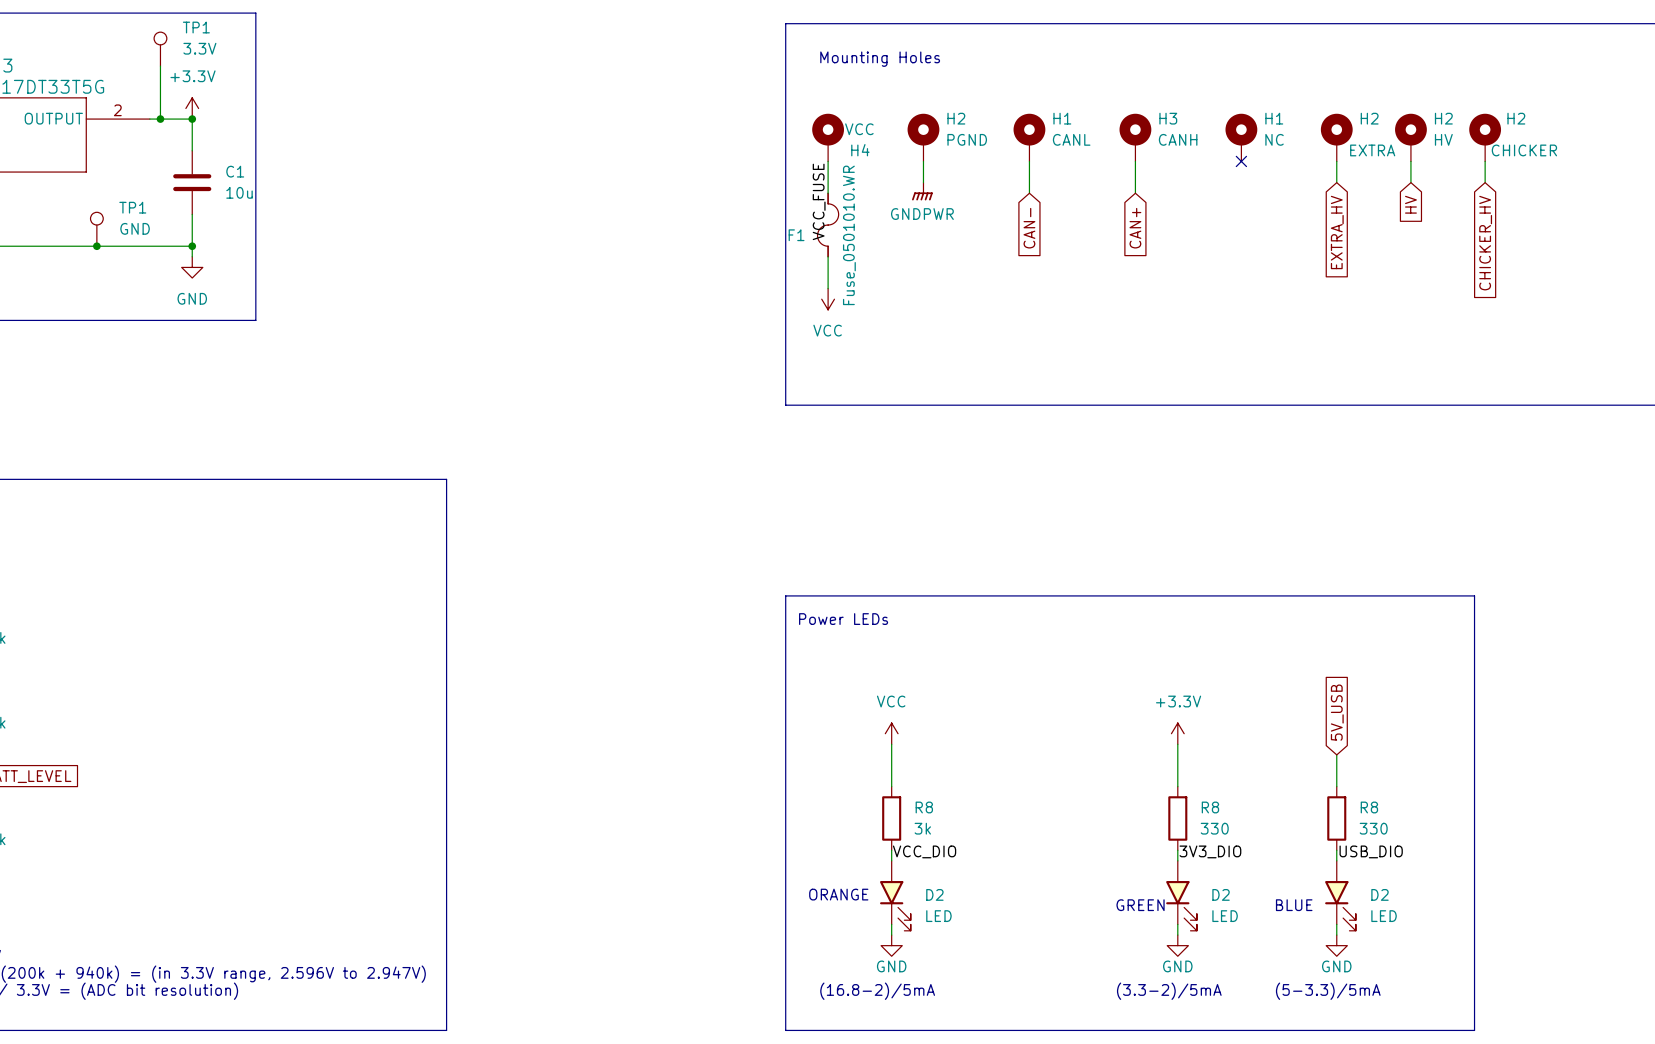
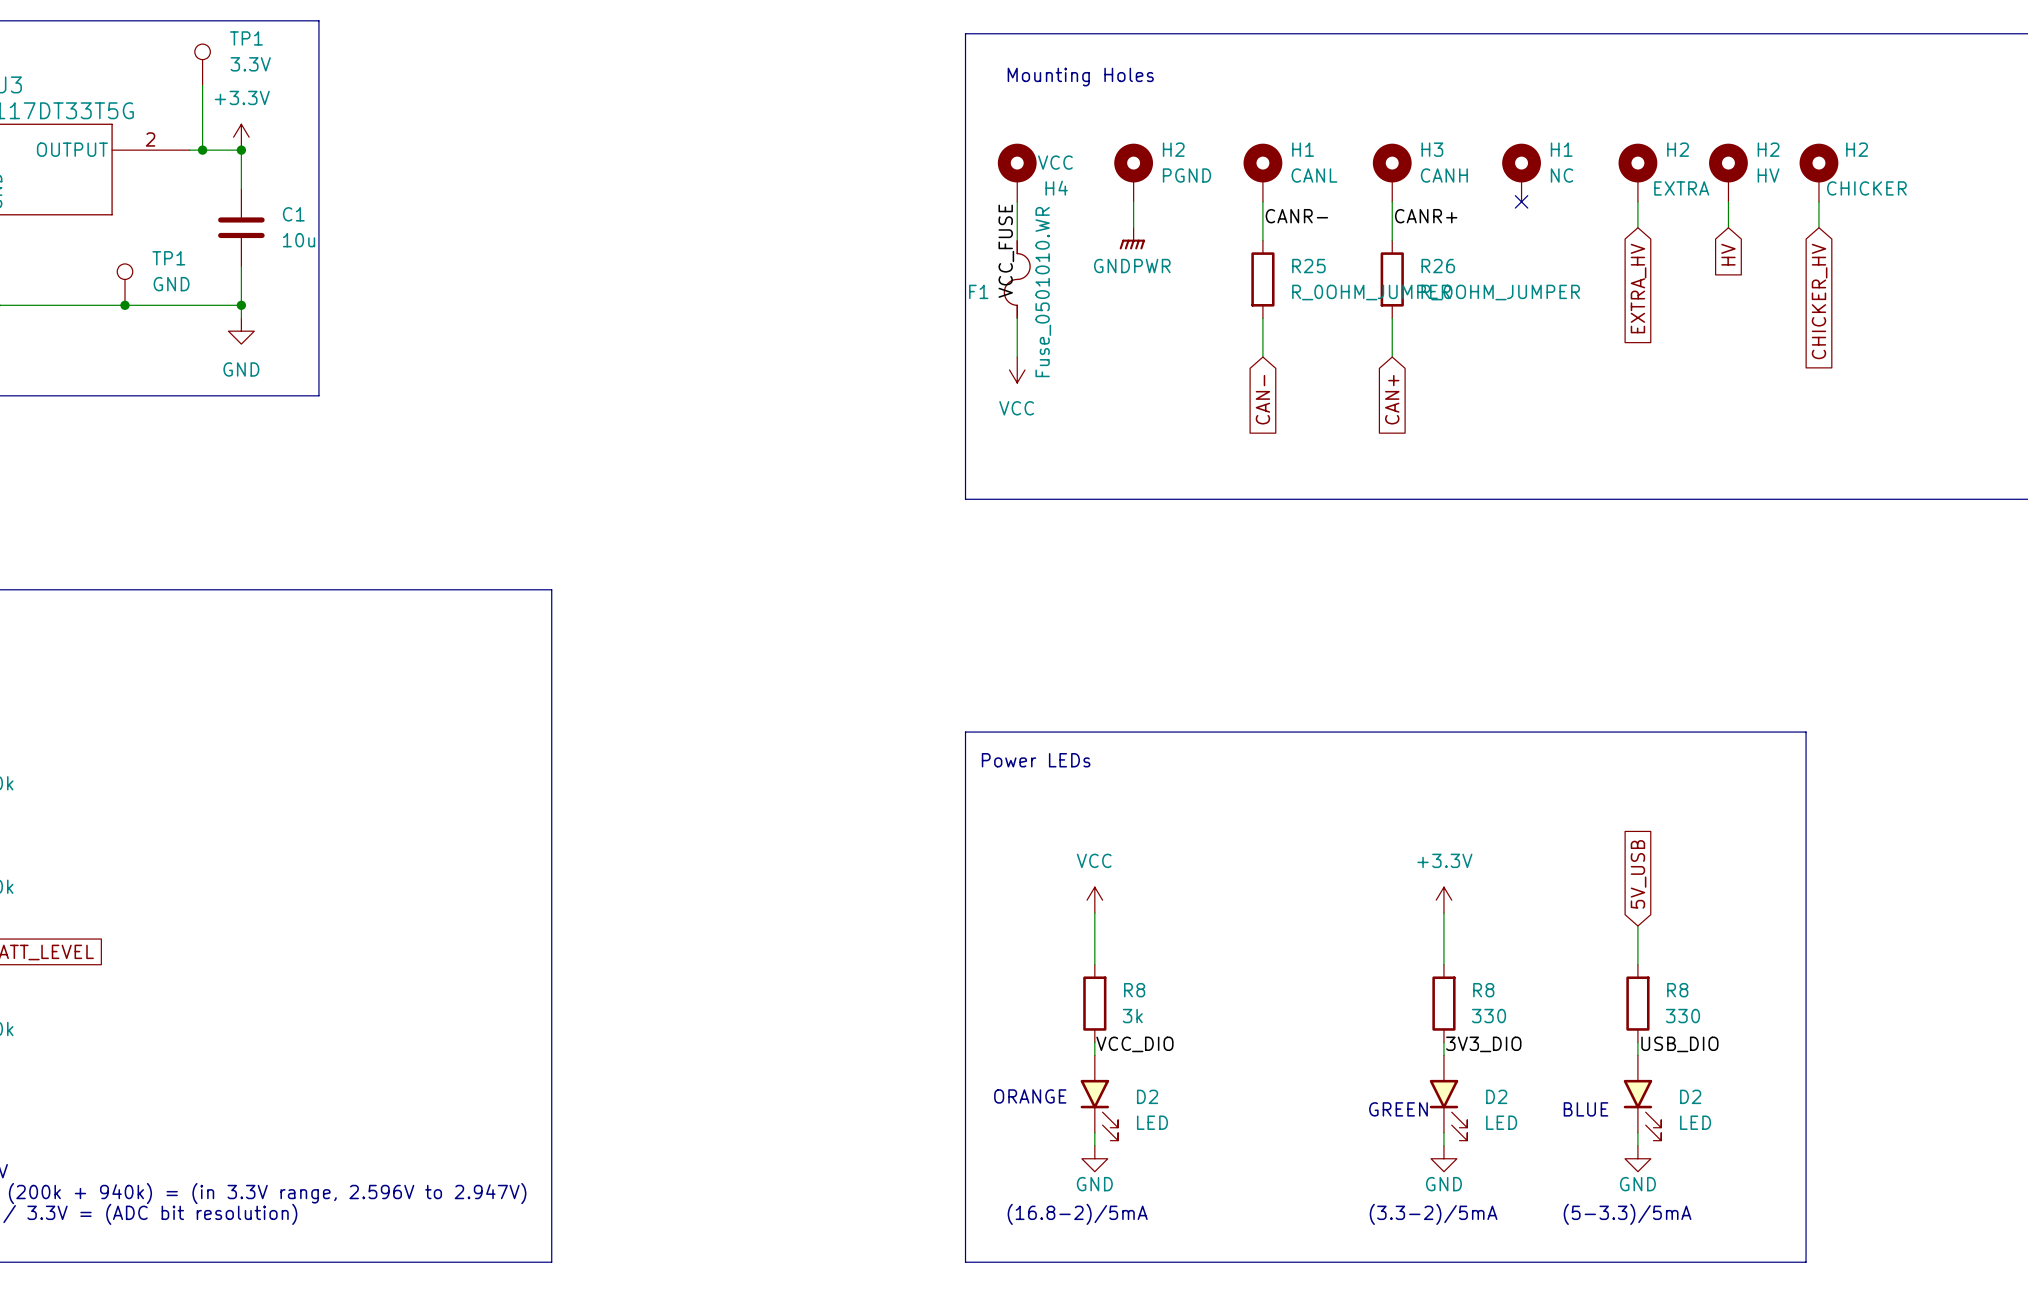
label: none -> CANR- (1296, 216)
label: none -> CANR+ (1426, 216)
R25: none -> R_0OHM_JUMPER (1262, 279)
R26: none -> R_0OHM_JUMPER (1392, 279)
global label position: CAN- (1029, 228) -> CAN- (1262, 399)
global label position: CAN+ (1135, 228) -> CAN+ (1392, 399)
wire: none -> (1262, 318) (1262, 357)
wire: none -> (1392, 318) (1392, 357)

